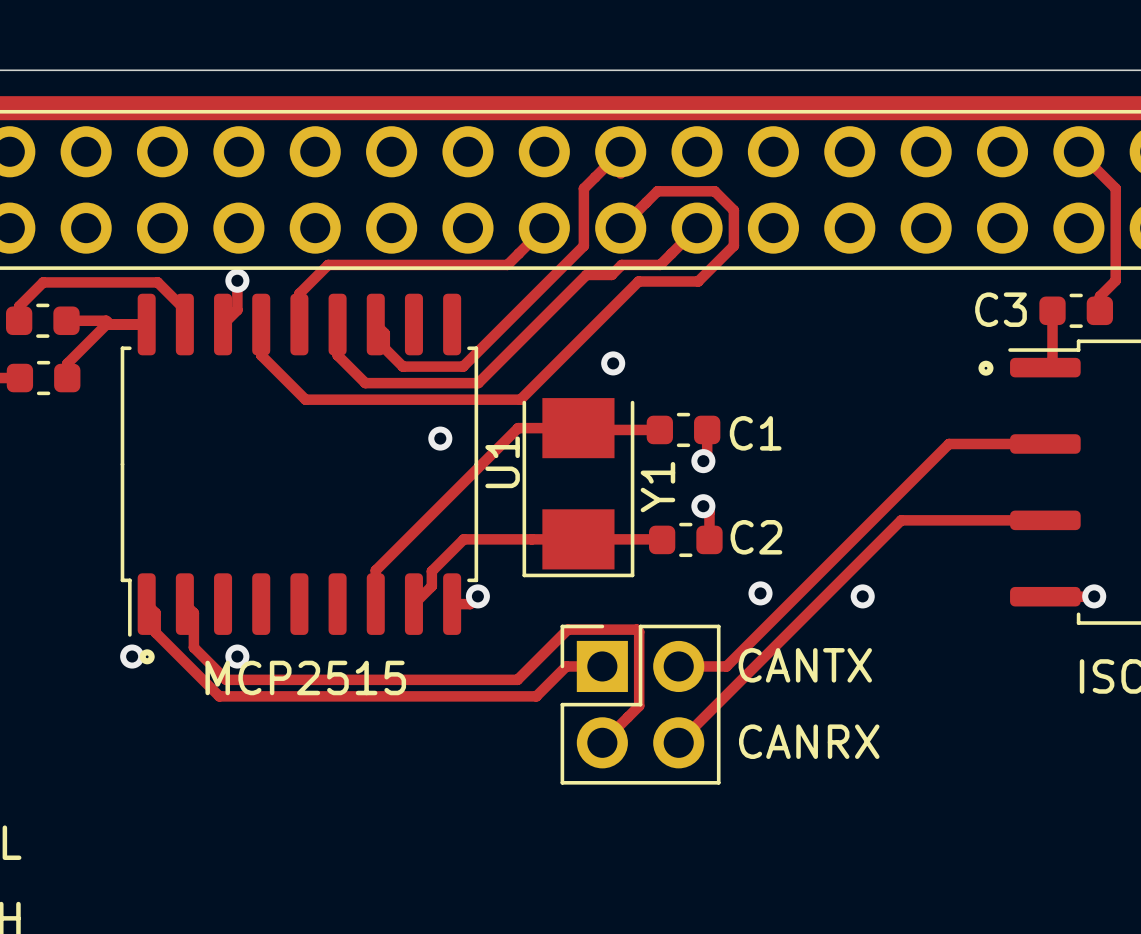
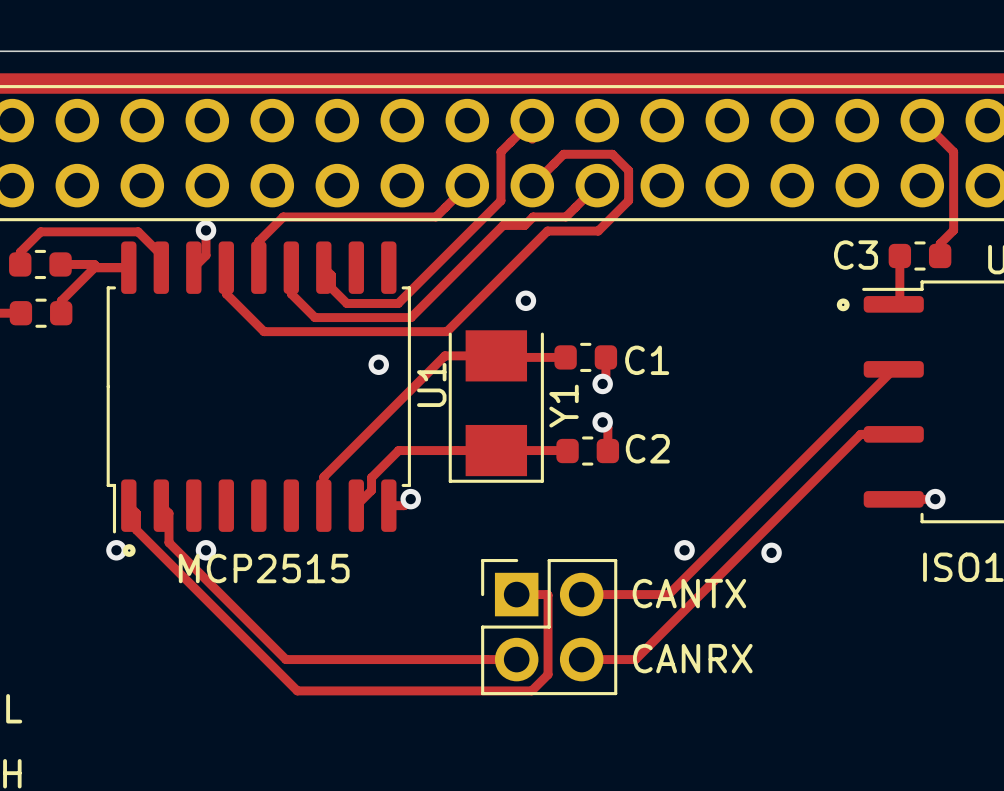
track: (1045, 443) (949, 443) (726, 666) (678, 666) -> (893, 369) (668, 594) (581, 594)
track: (1006, 520) (901, 520) (678, 742) -> (860, 434) (635, 659) (581, 659)
via: (760, 593) -> none
via: (862, 596) -> none
via: none -> (684, 550)
via: none -> (771, 552)
text position: CANTX (805, 665) -> CANTX (689, 593)
track: (602, 666) (566, 666) (536, 696) (219, 696) -> (516, 594) (548, 595) (548, 674) (531, 690) (297, 690) (190, 584)
track: (226, 679) (517, 679) (567, 629) (636, 629) (639, 631) (639, 705) (602, 742) -> (196, 570) (285, 659) (516, 659)
part position: (640, 704) -> (549, 627)
text position: CANRX (809, 741) -> CANRX (692, 658)

